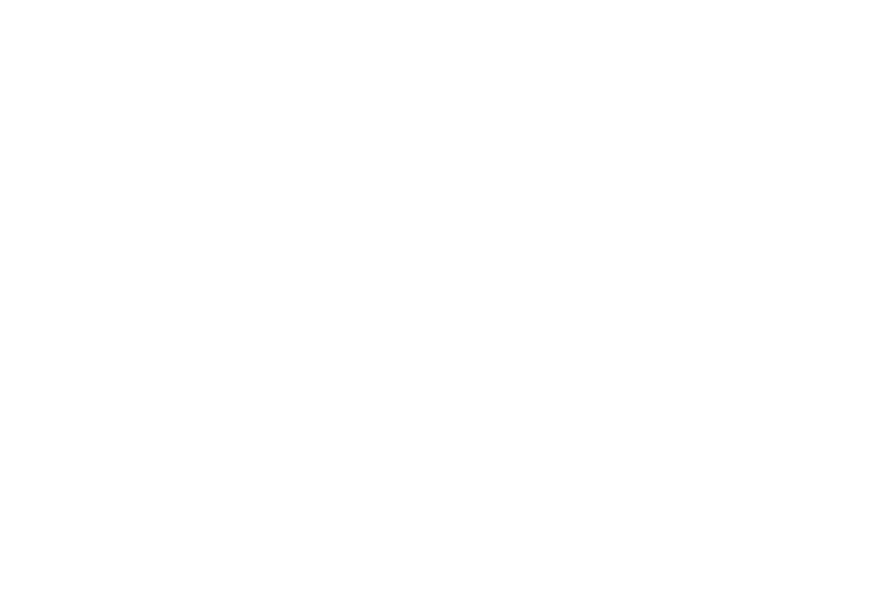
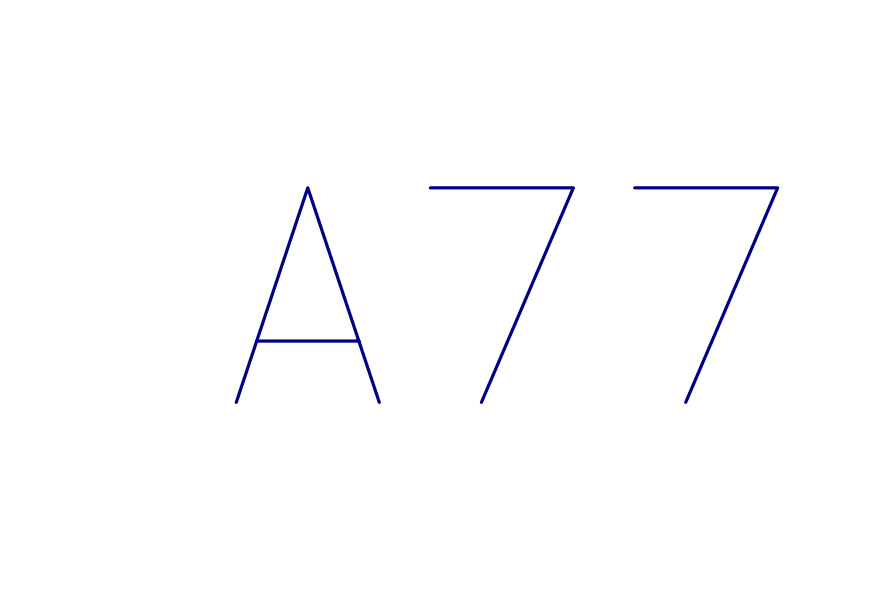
text: none -> A77 (506, 295)

